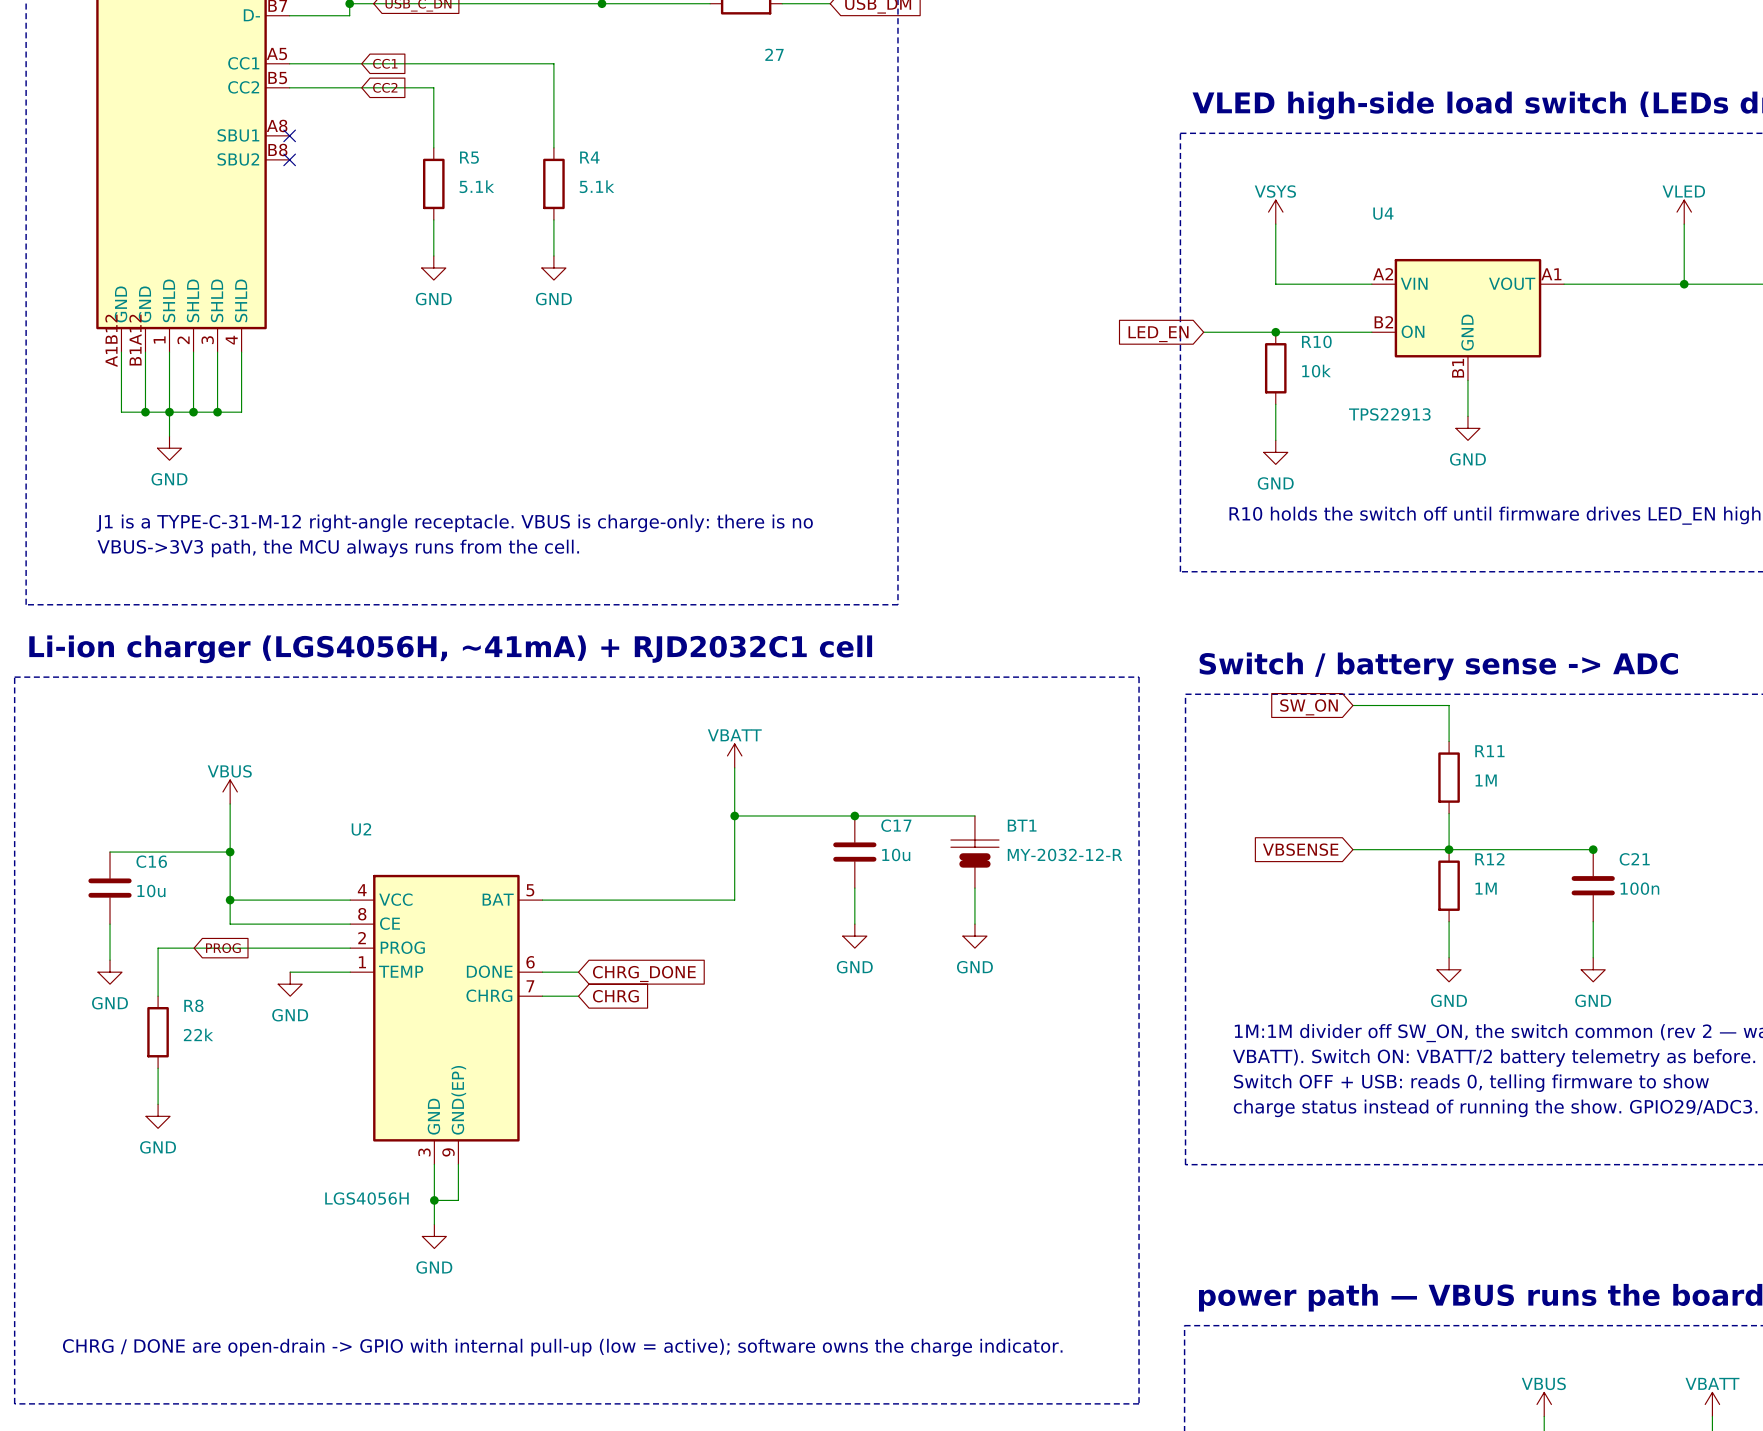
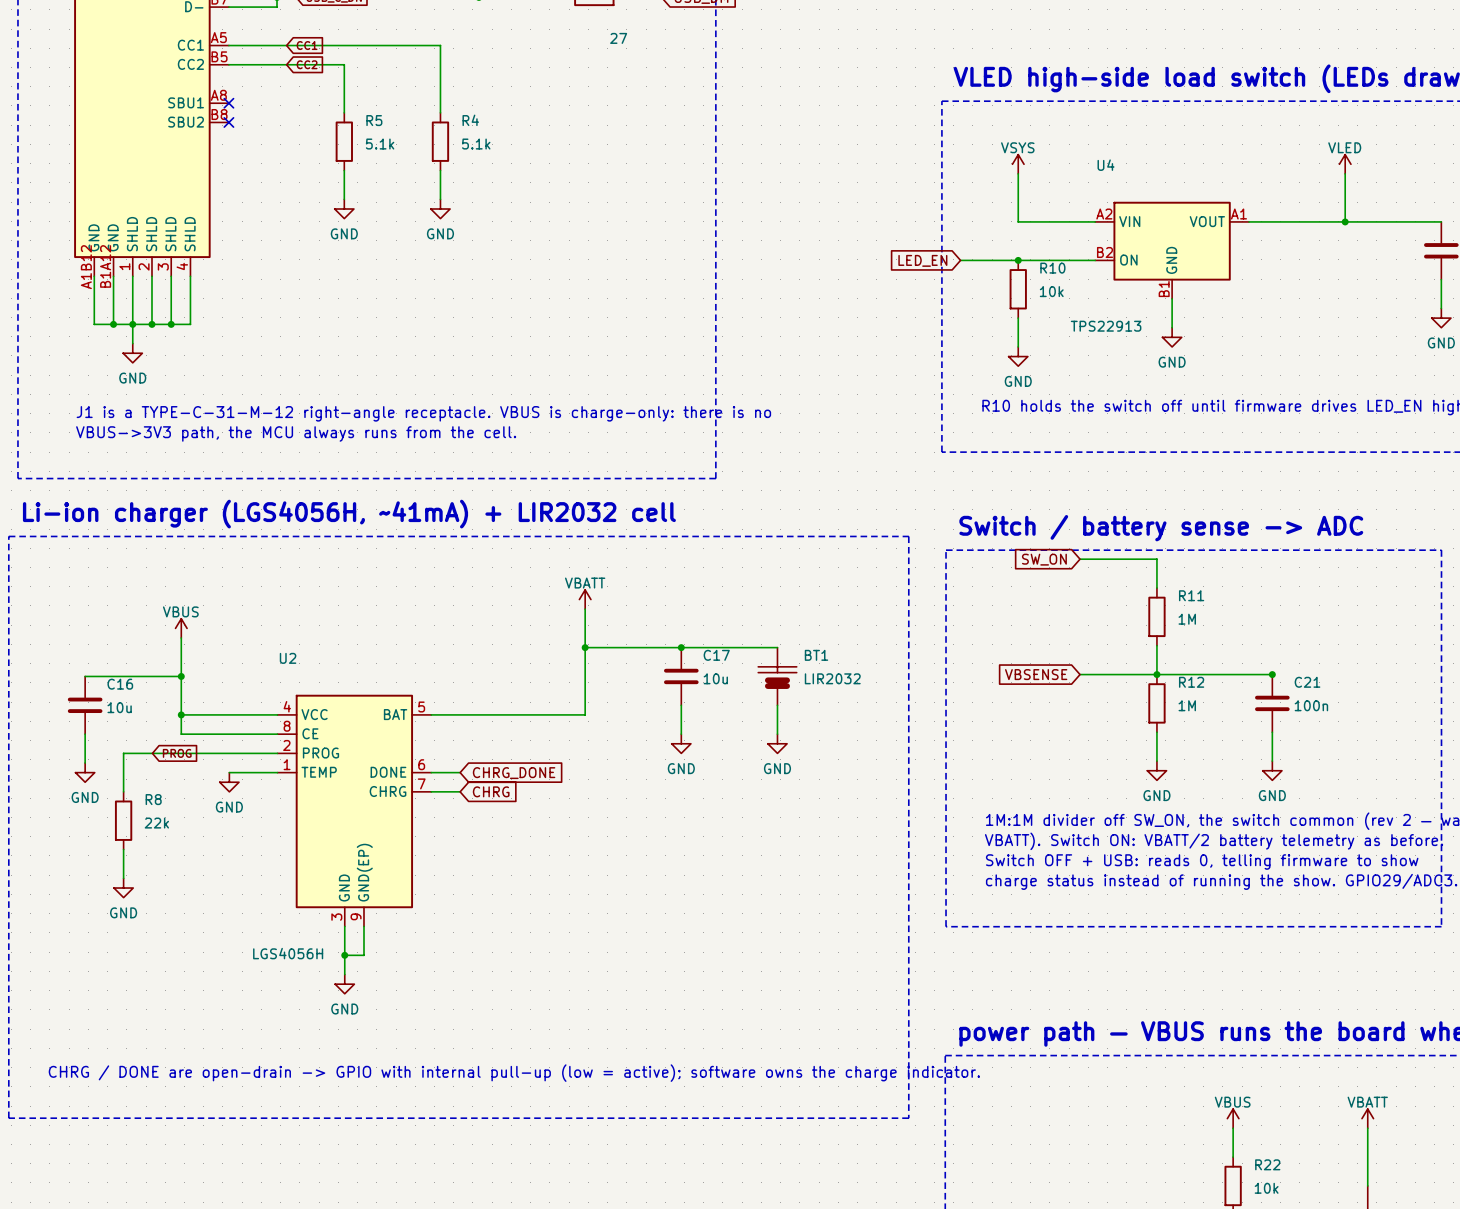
text: Li-ion charger (LGS4056H, ~41mA) + RJD2032C1 cell (450, 649) -> Li-ion charger (LGS4056H, ~41mA) + LIR2032 cell (349, 514)
BT1 value: MY-2032-12-R (1064, 854) -> LIR2032 (832, 678)

